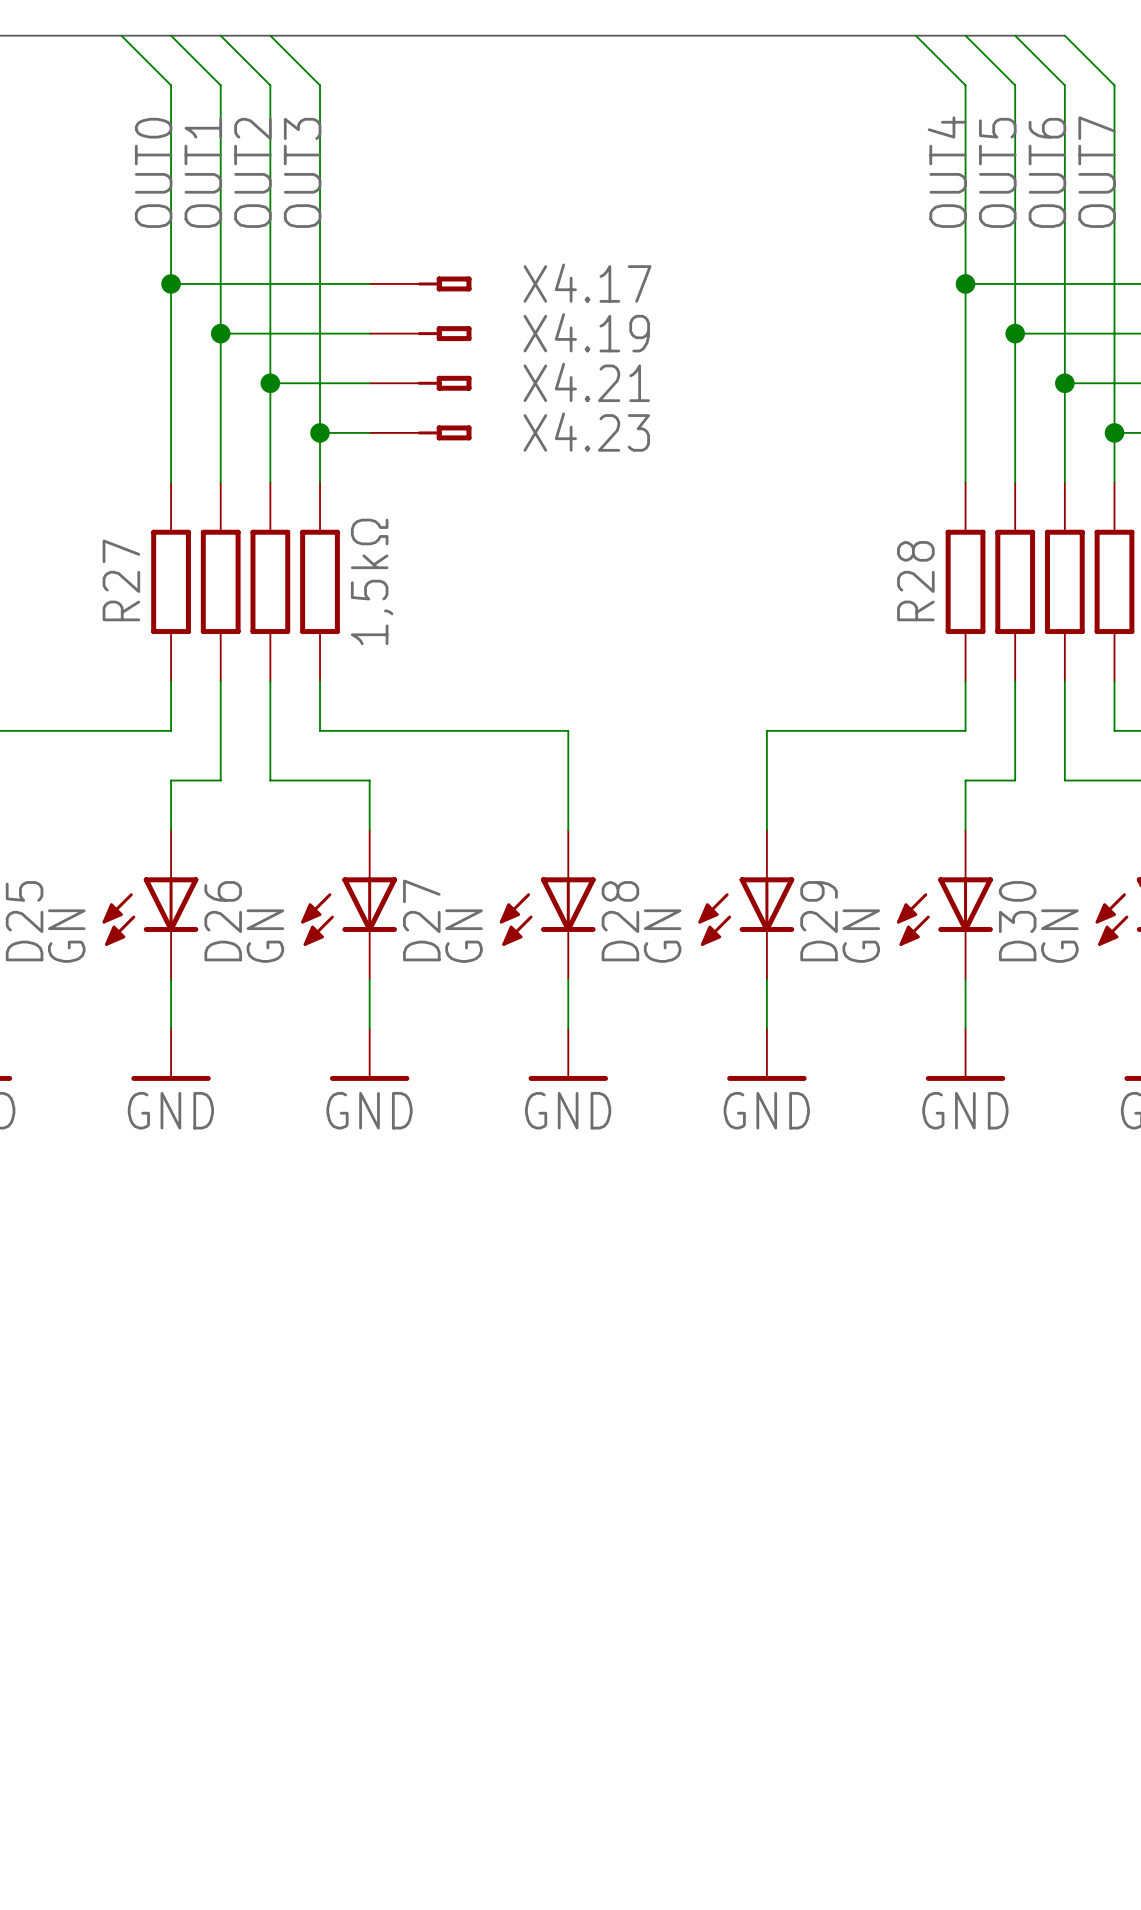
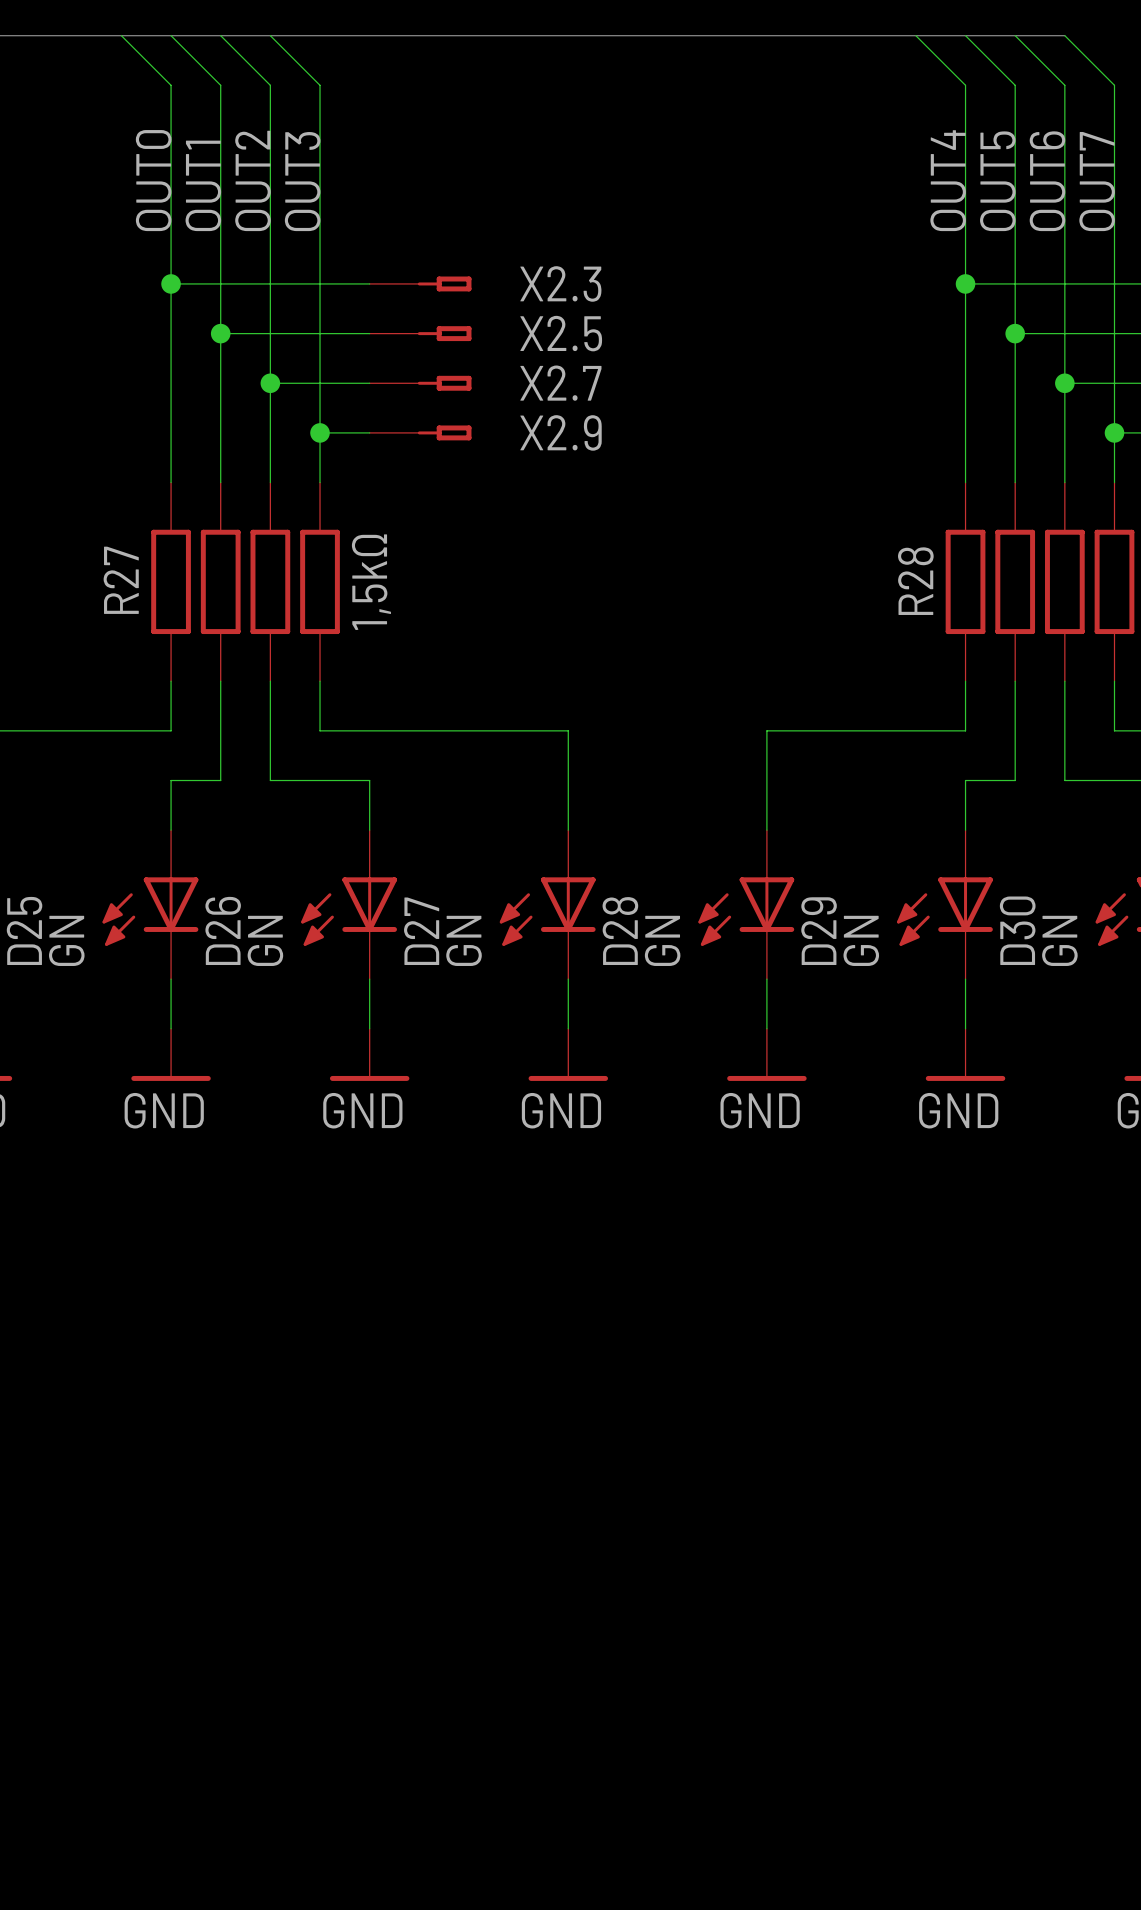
X4.17 name: X4.17 (587, 283) -> X2.3 (560, 283)
X4.19 name: X4.19 (586, 332) -> X2.5 (561, 333)
X4.21 name: X4.21 (586, 382) -> X2.7 (560, 383)
X4.23 name: X4.23 (586, 432) -> X2.9 (561, 432)

